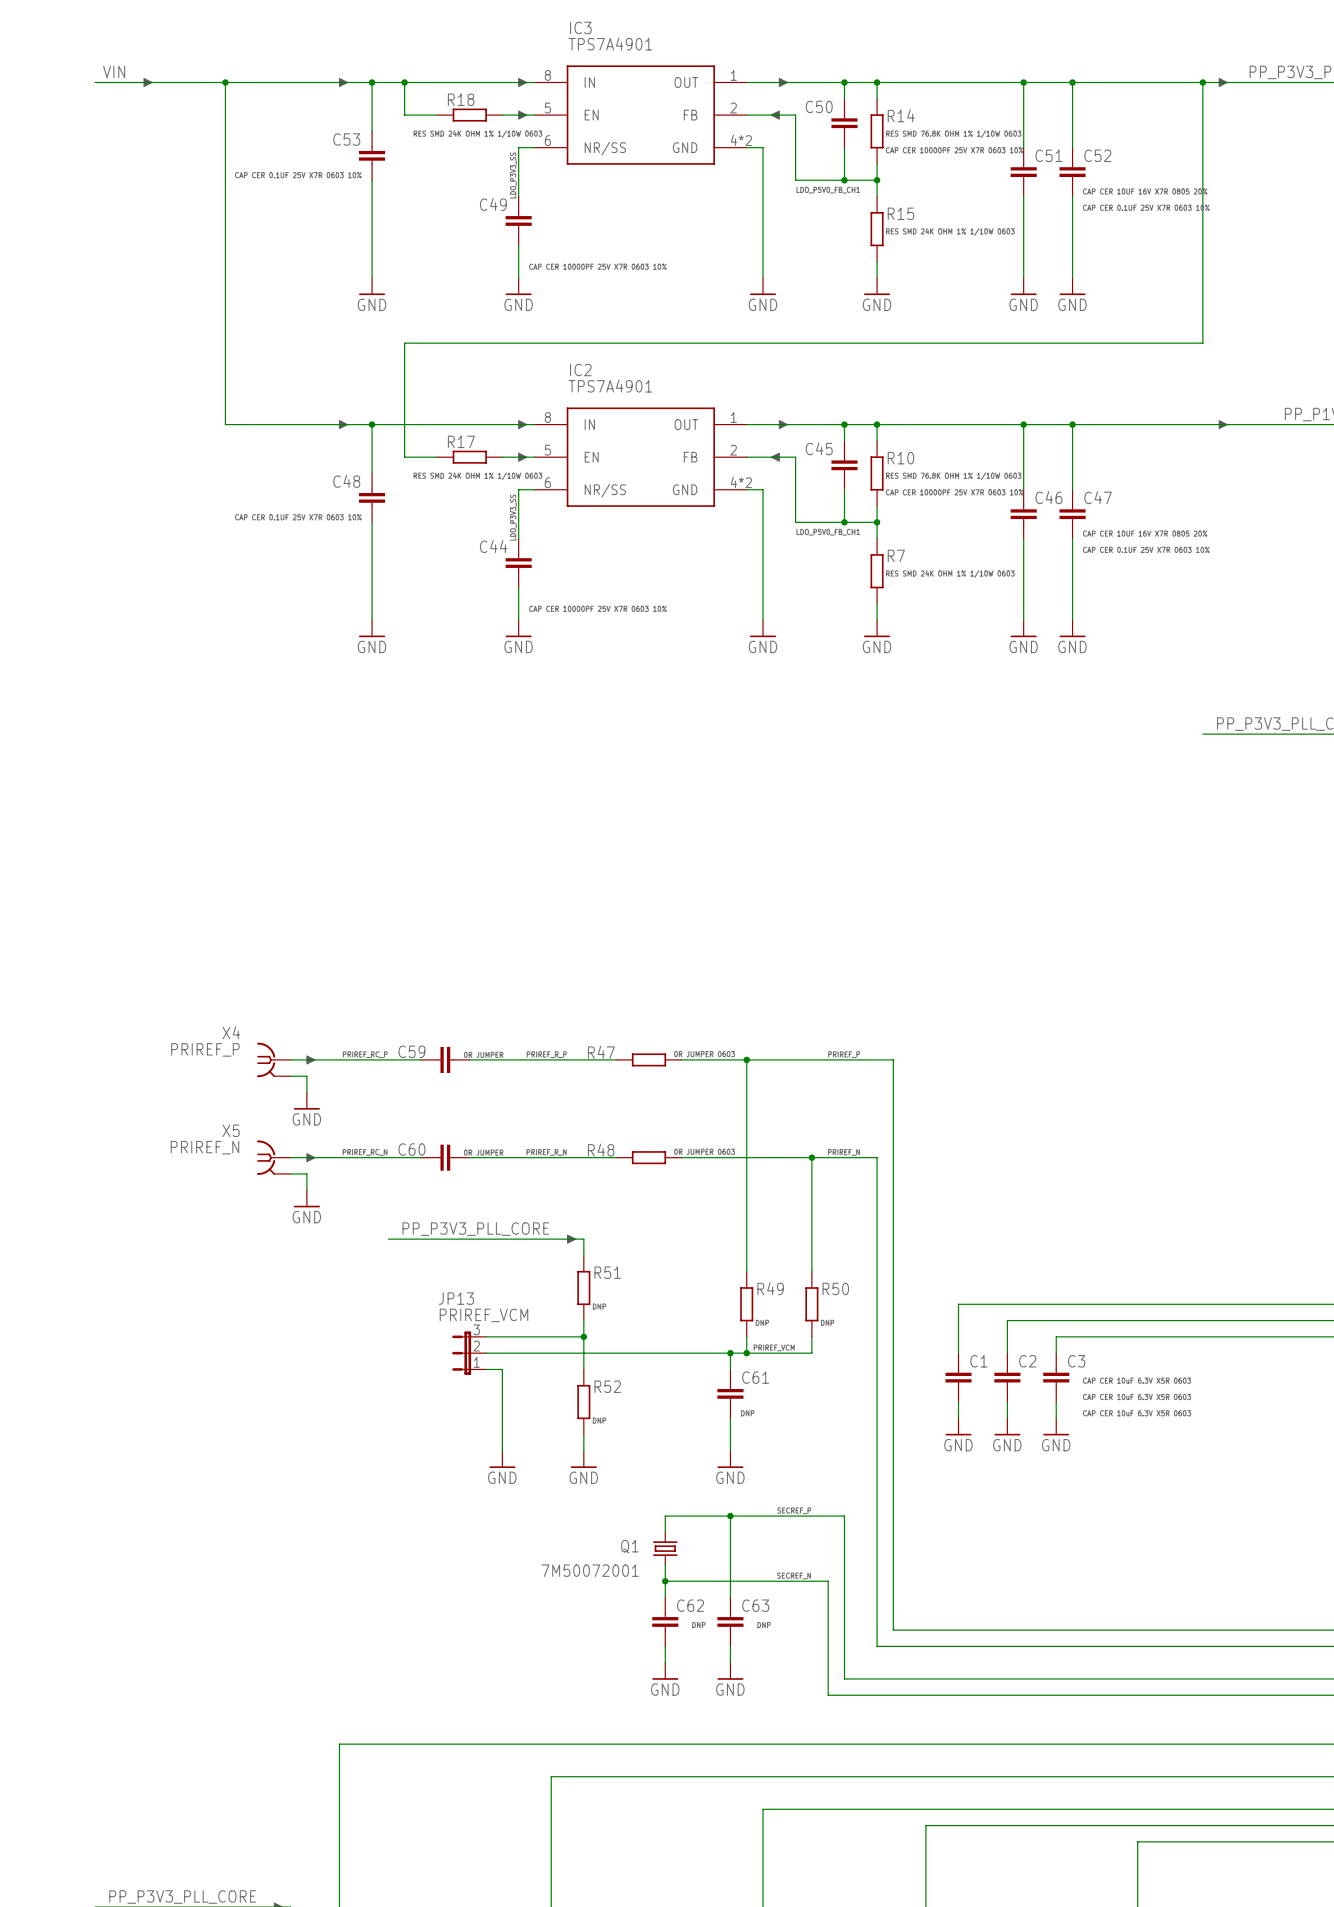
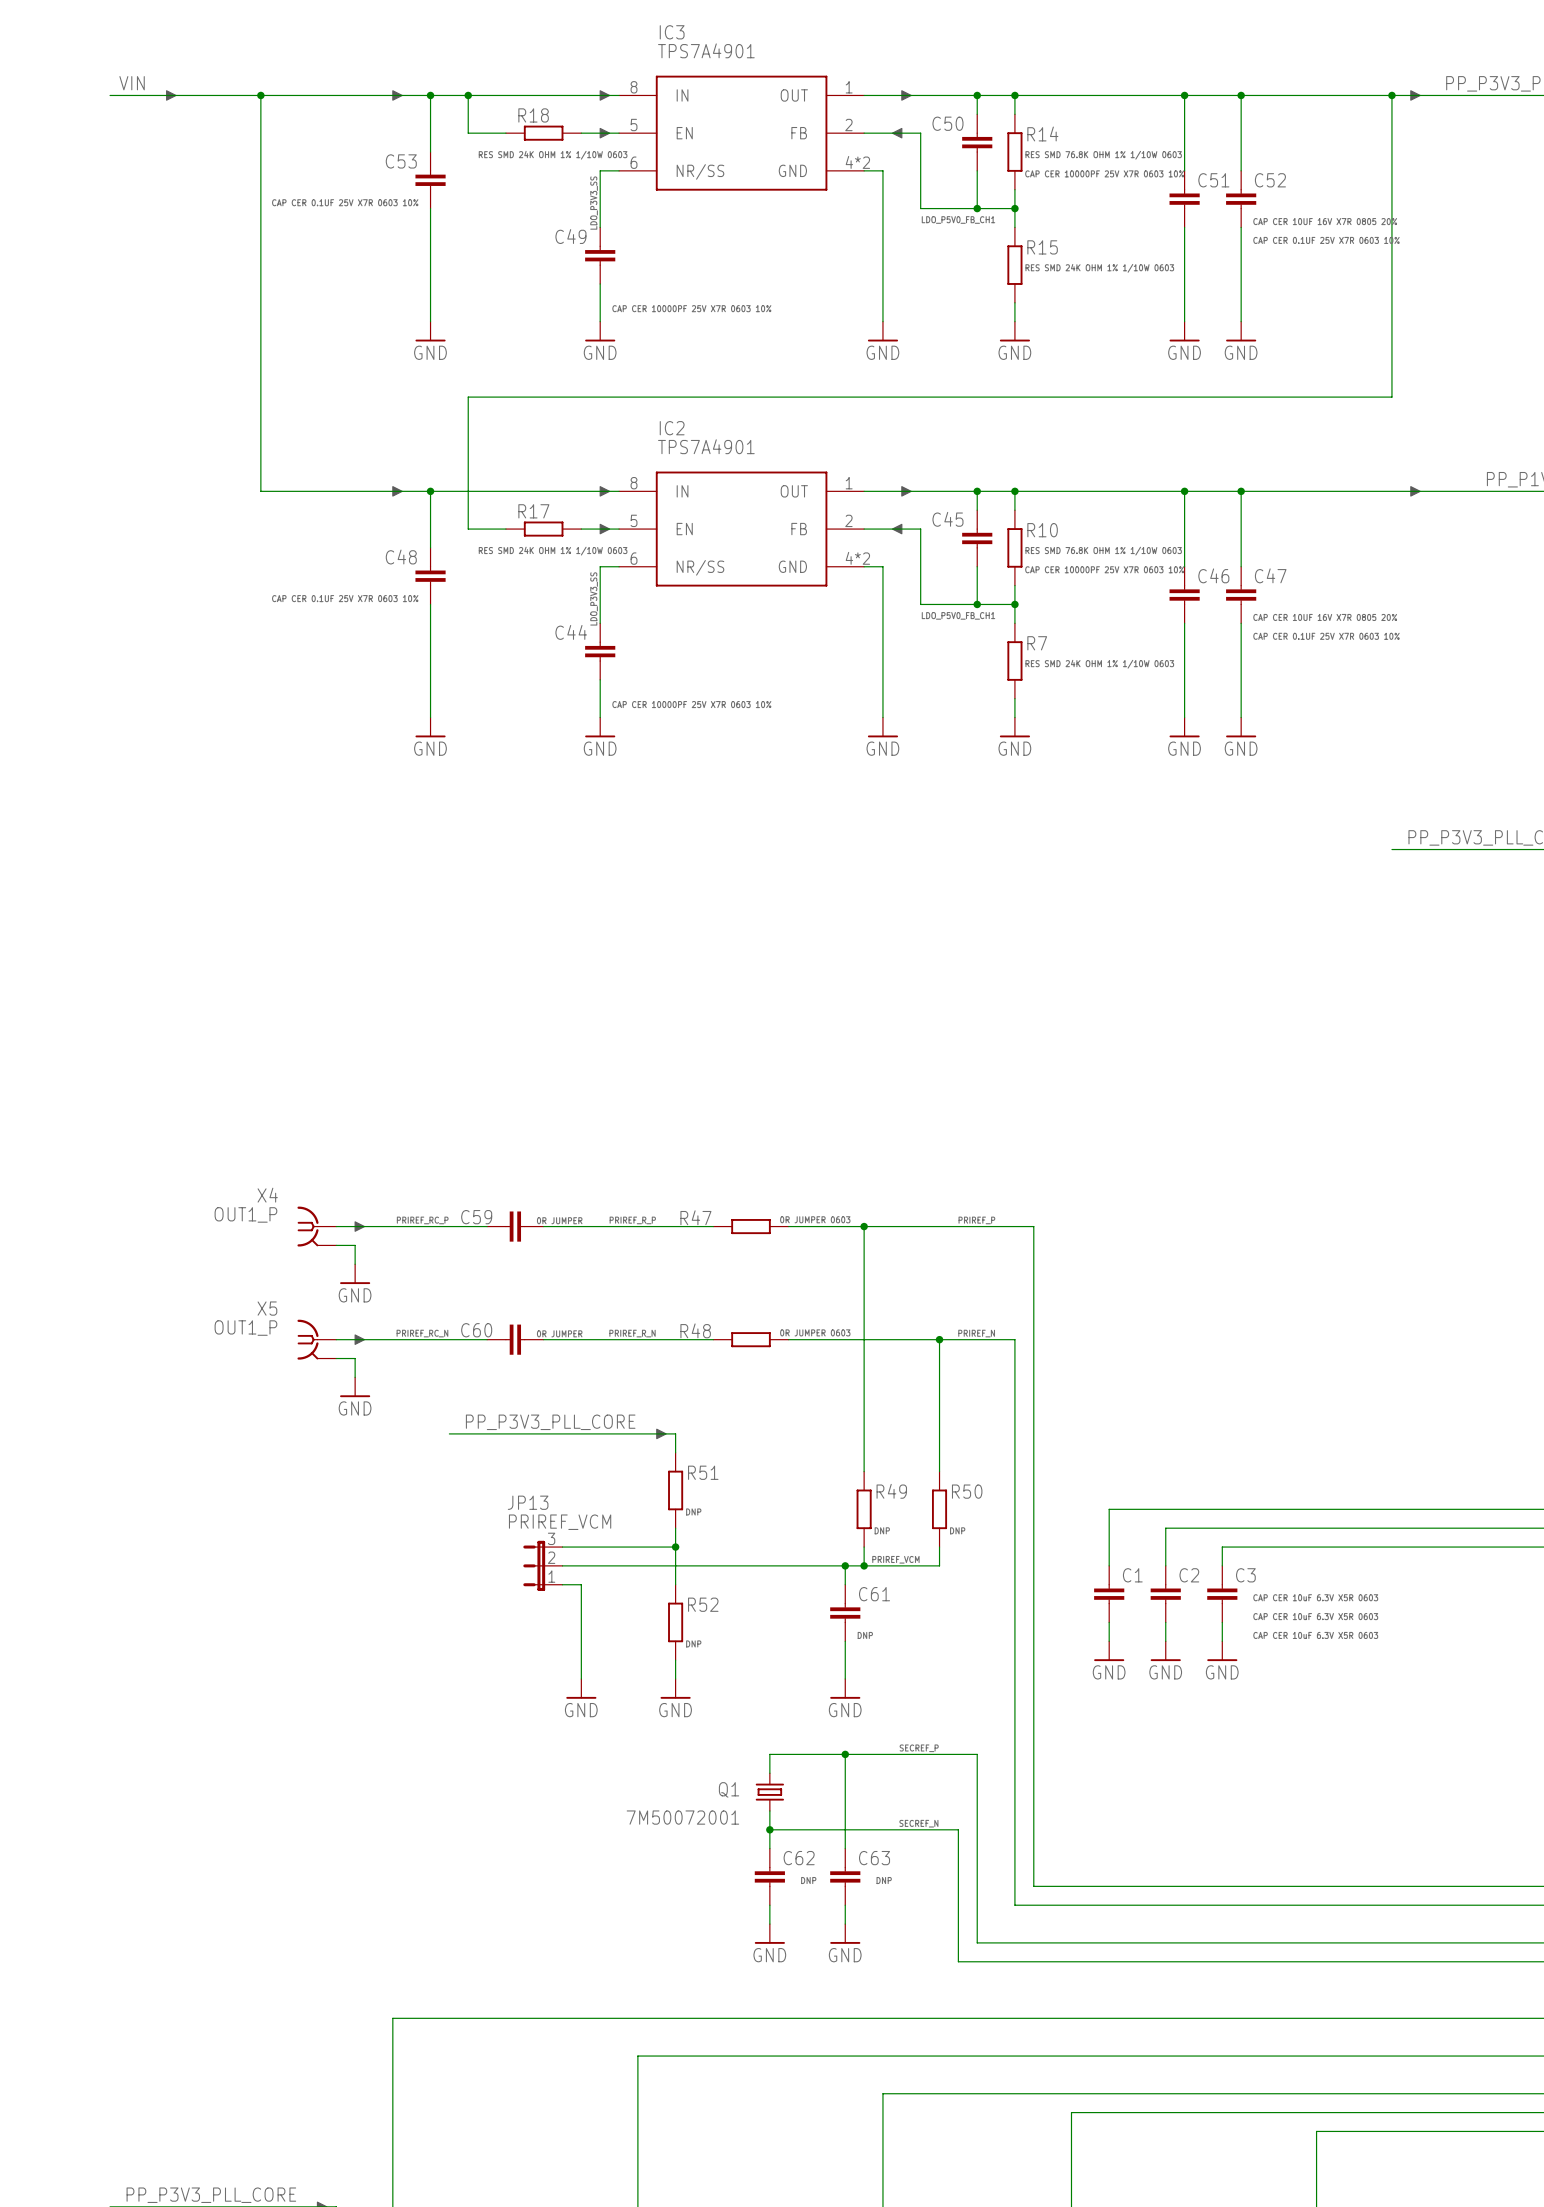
X4 value: PRIREF_P (205, 1049) -> OUT1_P (245, 1214)
X5 value: PRIREF_N (204, 1147) -> OUT1_P (245, 1328)

